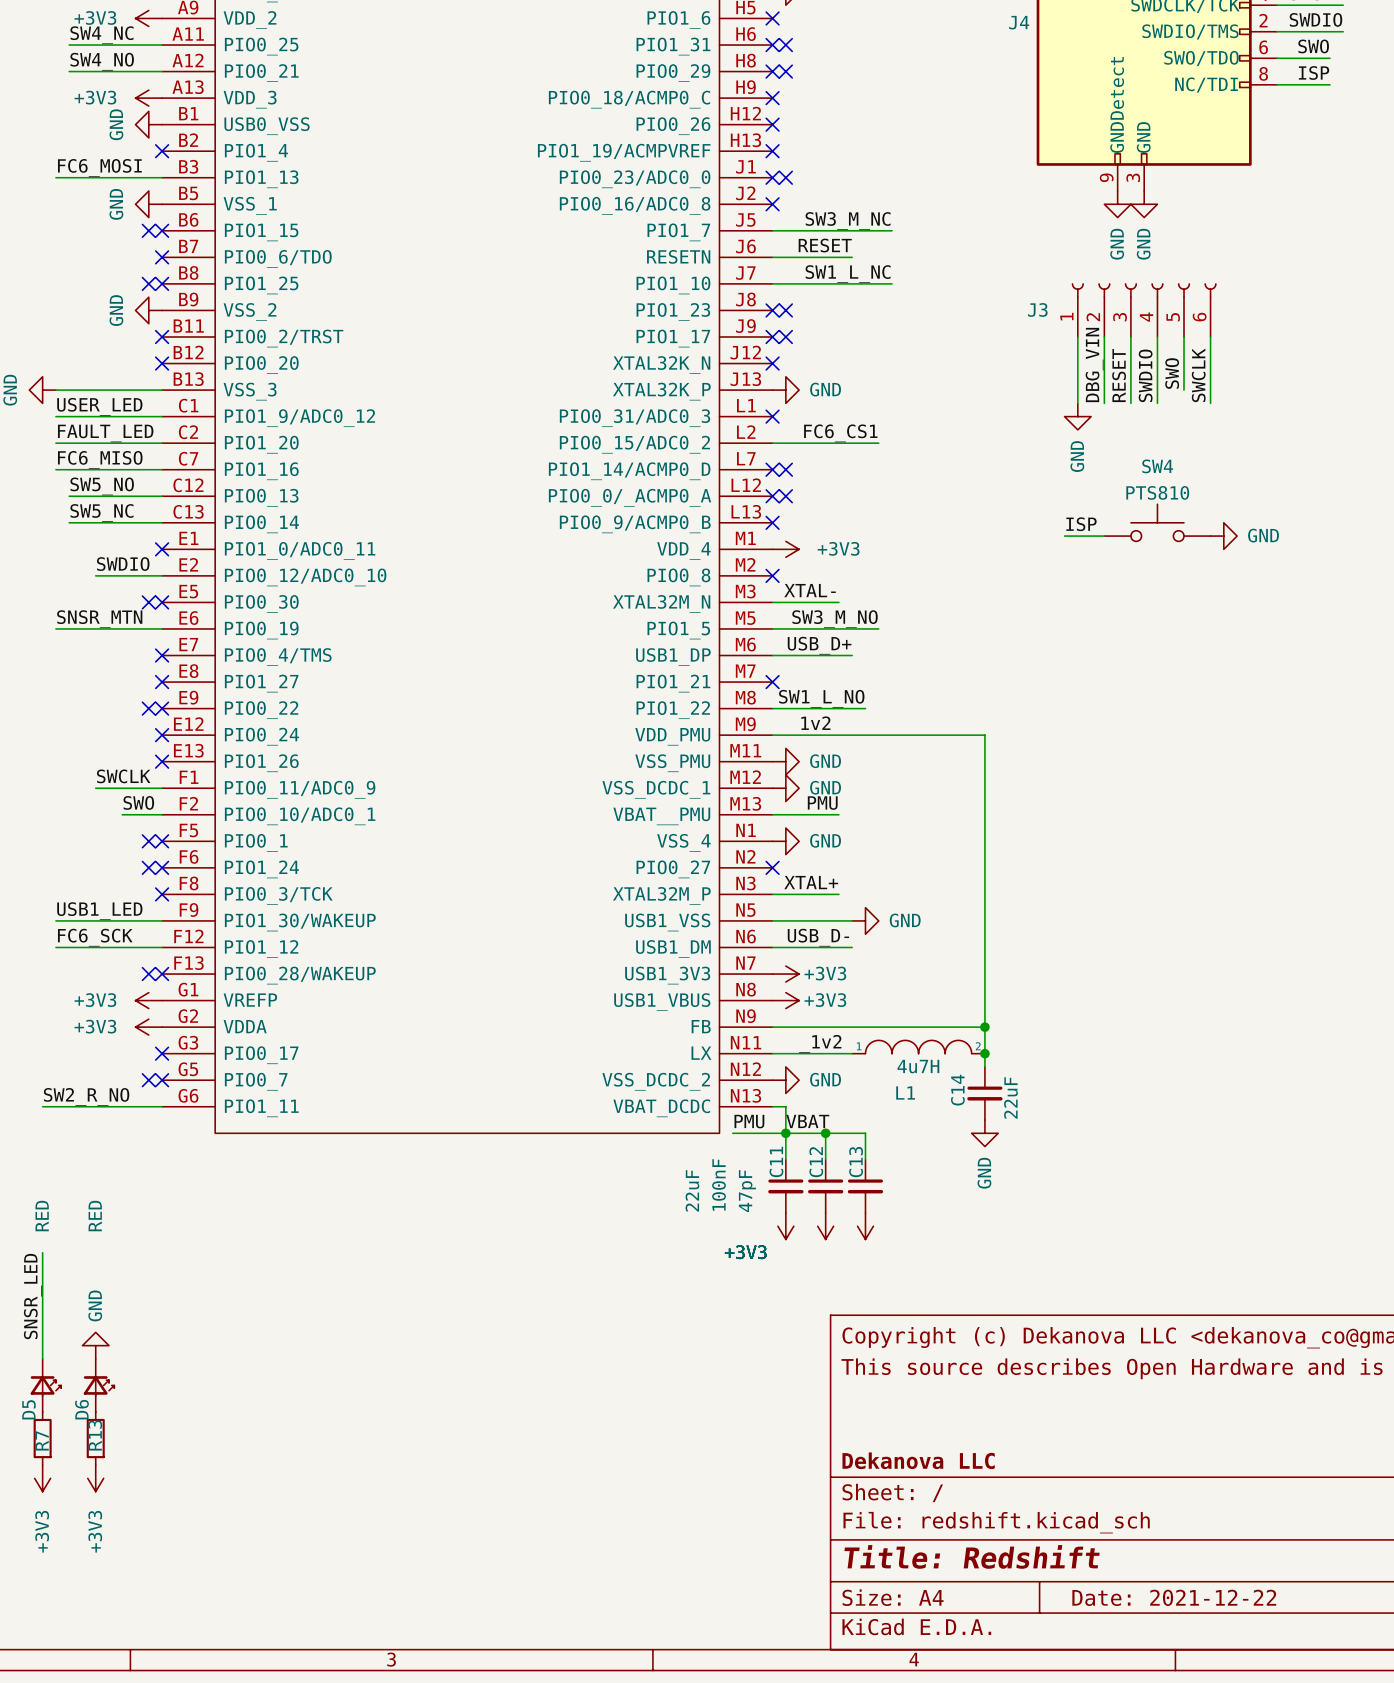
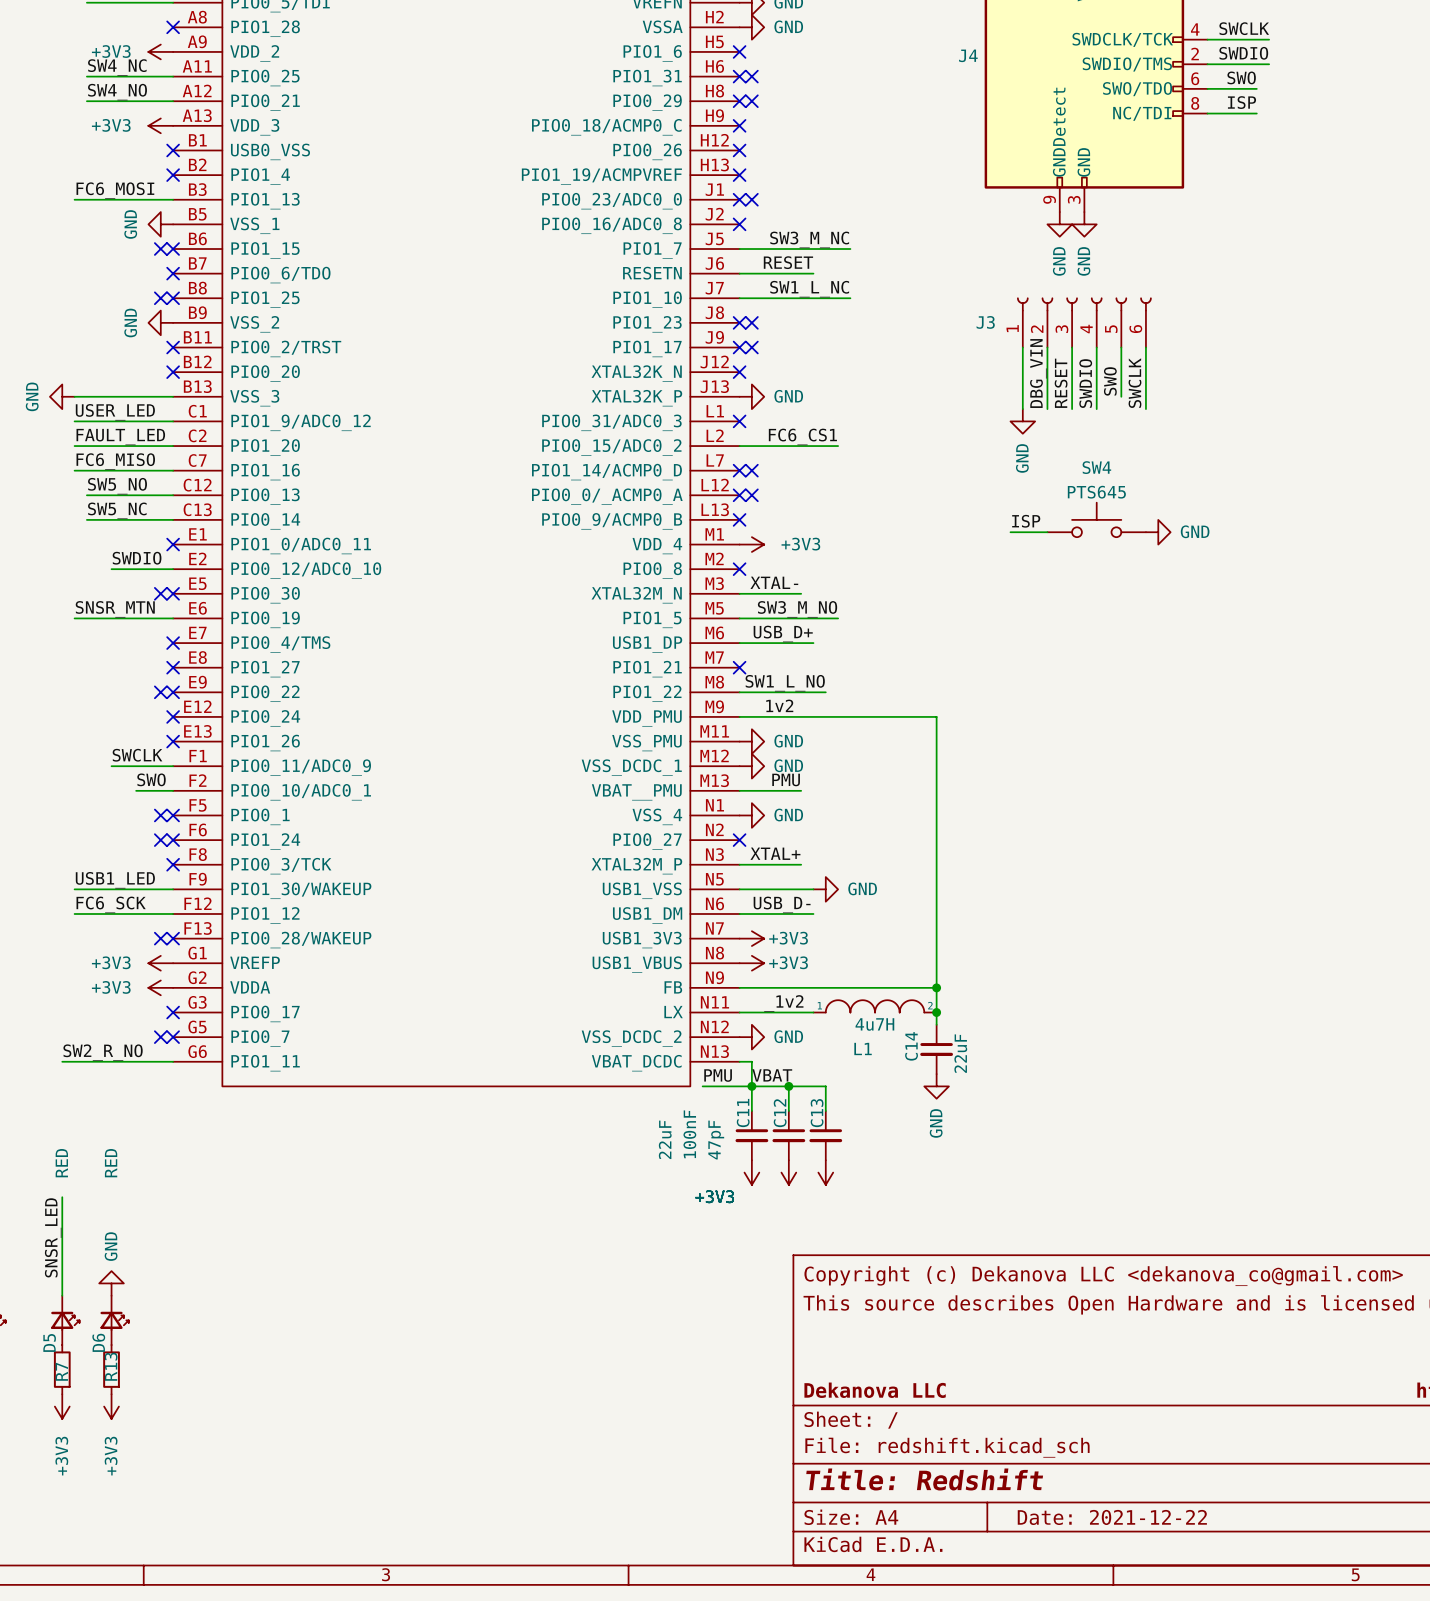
power symbol: GND (148, 124) -> none
no-connect mark: none -> (173, 150)
SW4 value: PTS810 (1157, 492) -> PTS645 (1096, 492)

